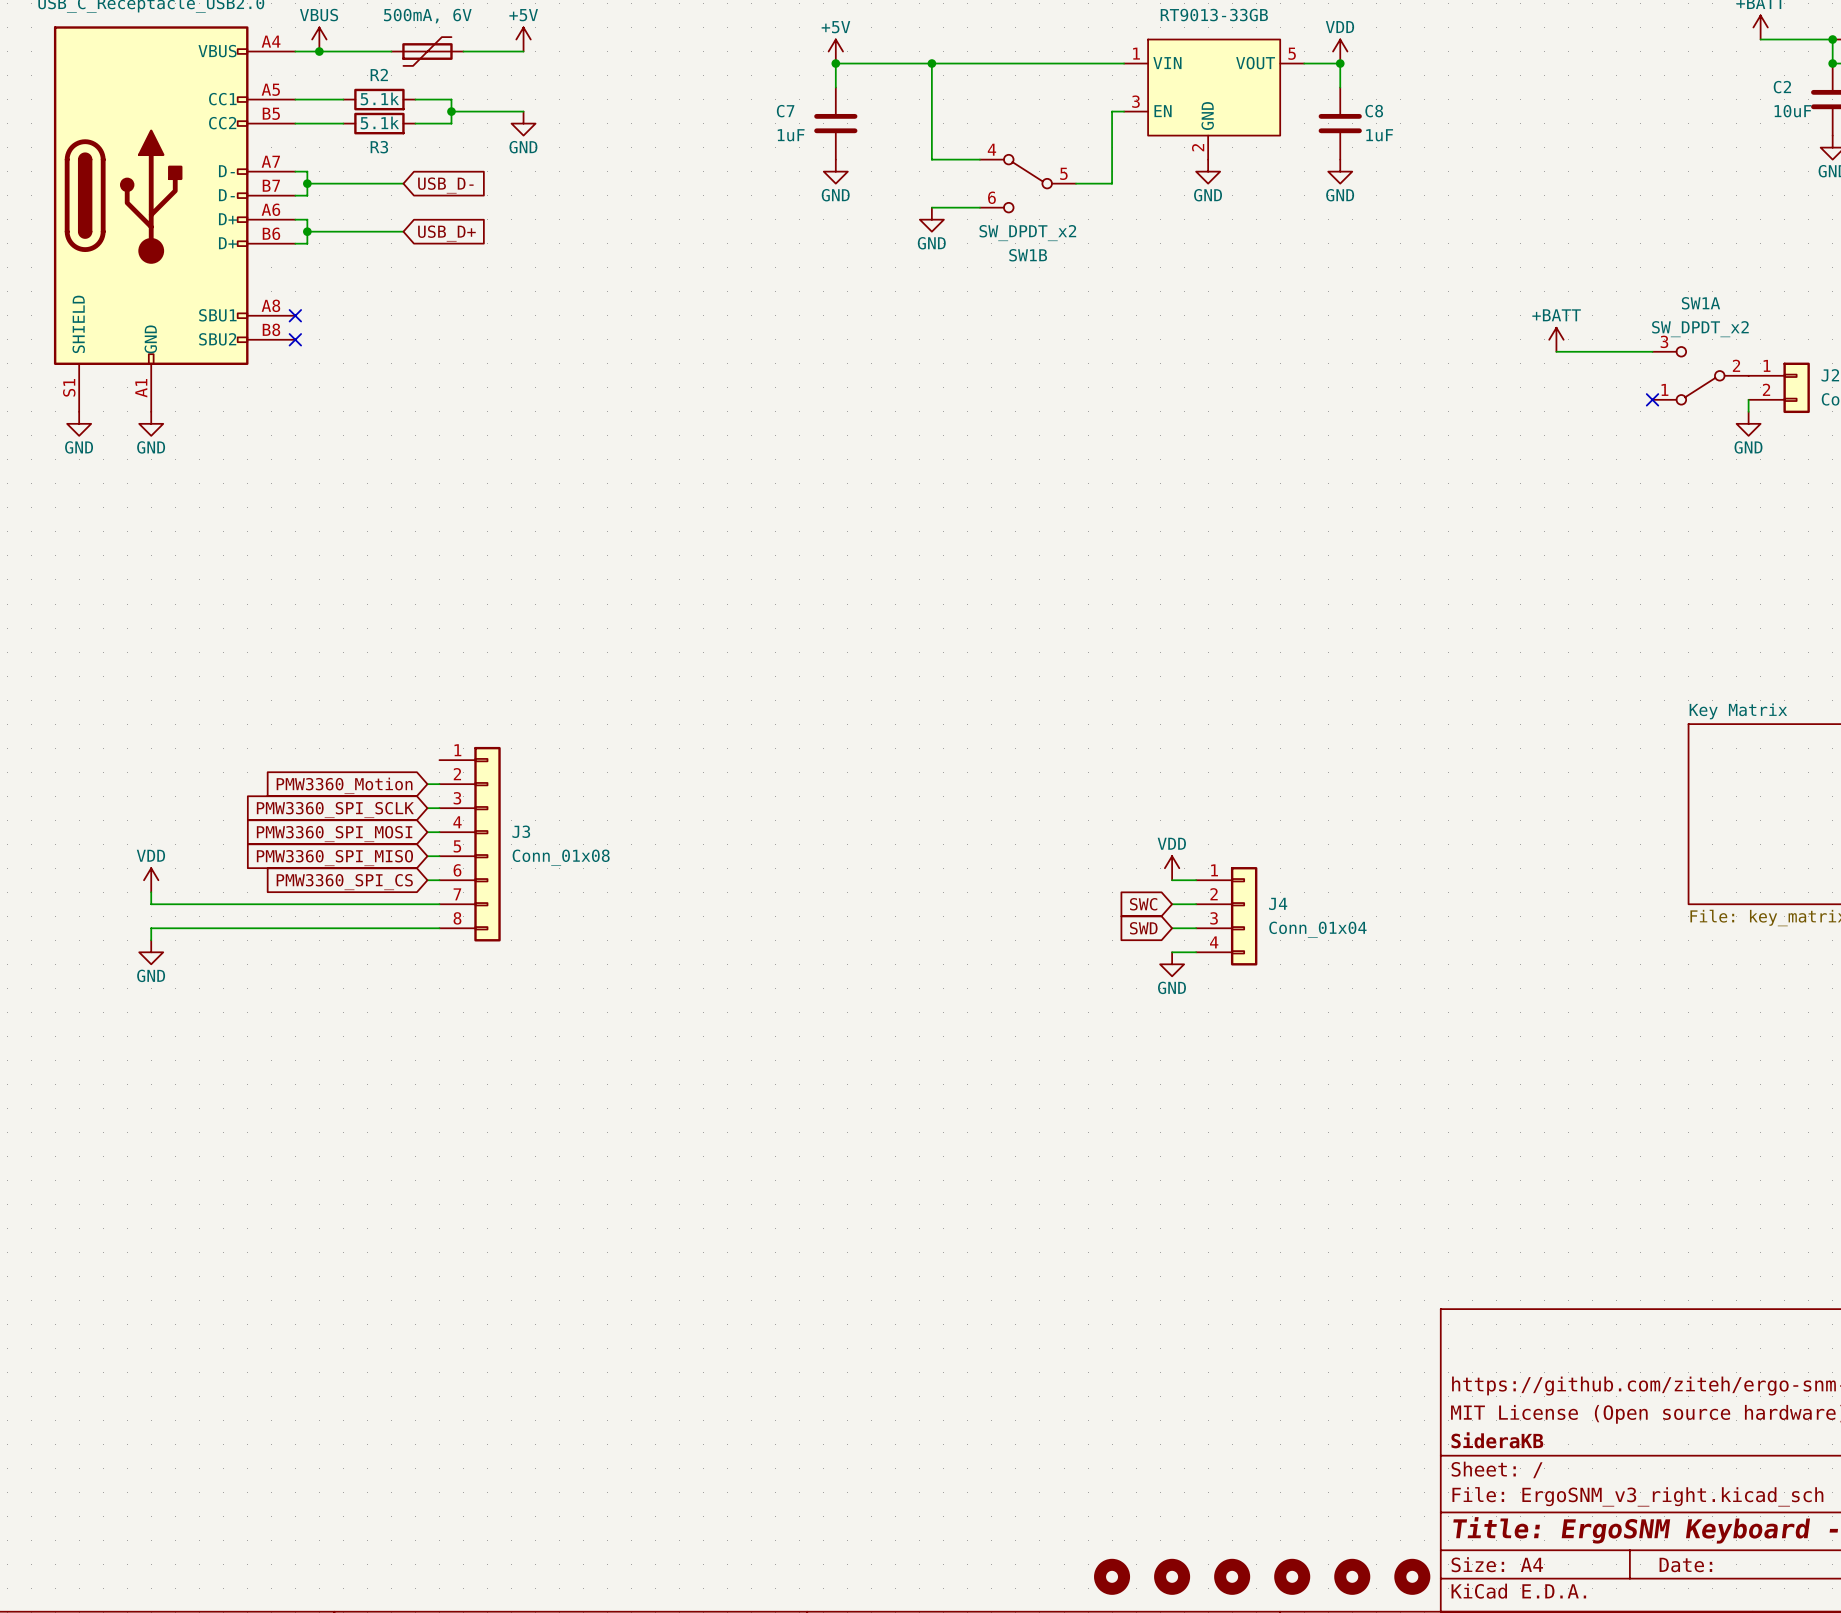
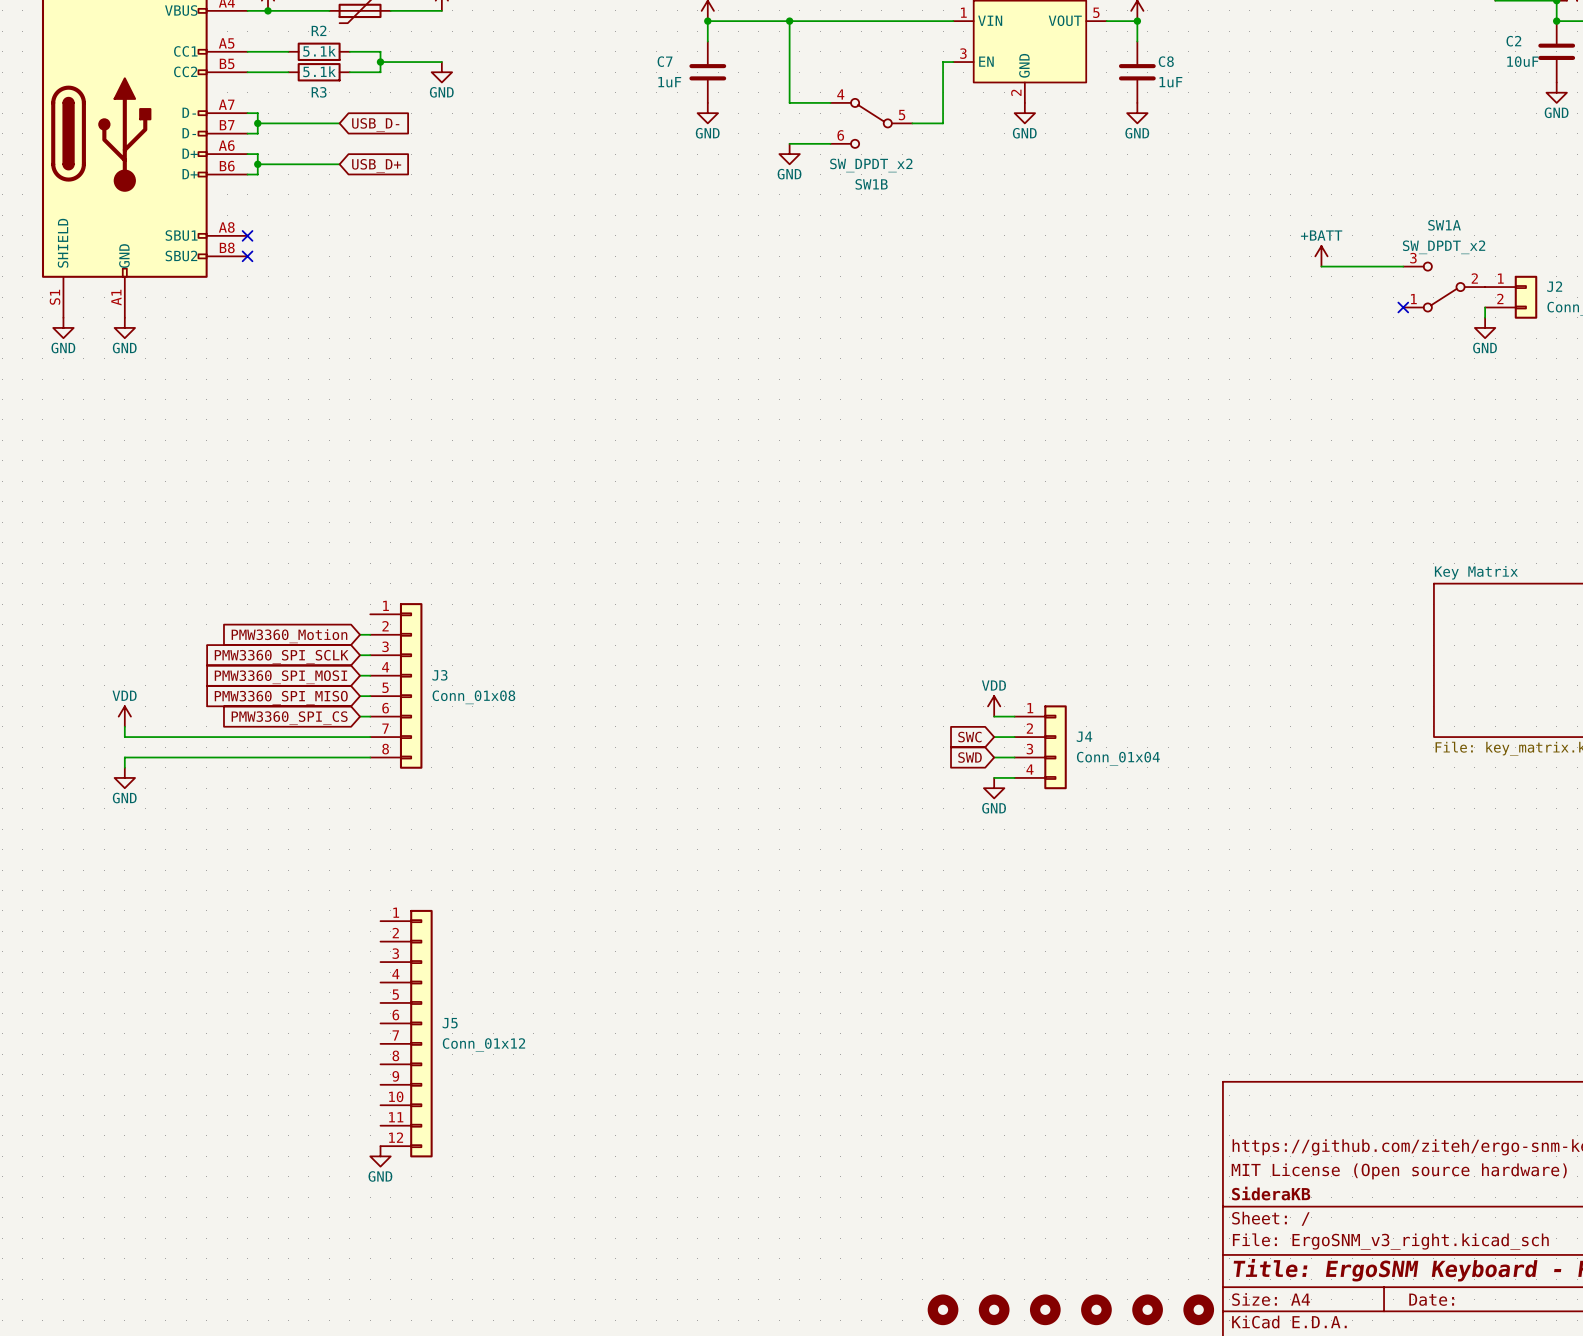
J5: none -> Conn_01x12 (406, 1033)
power symbol: none -> GND (380, 1156)

